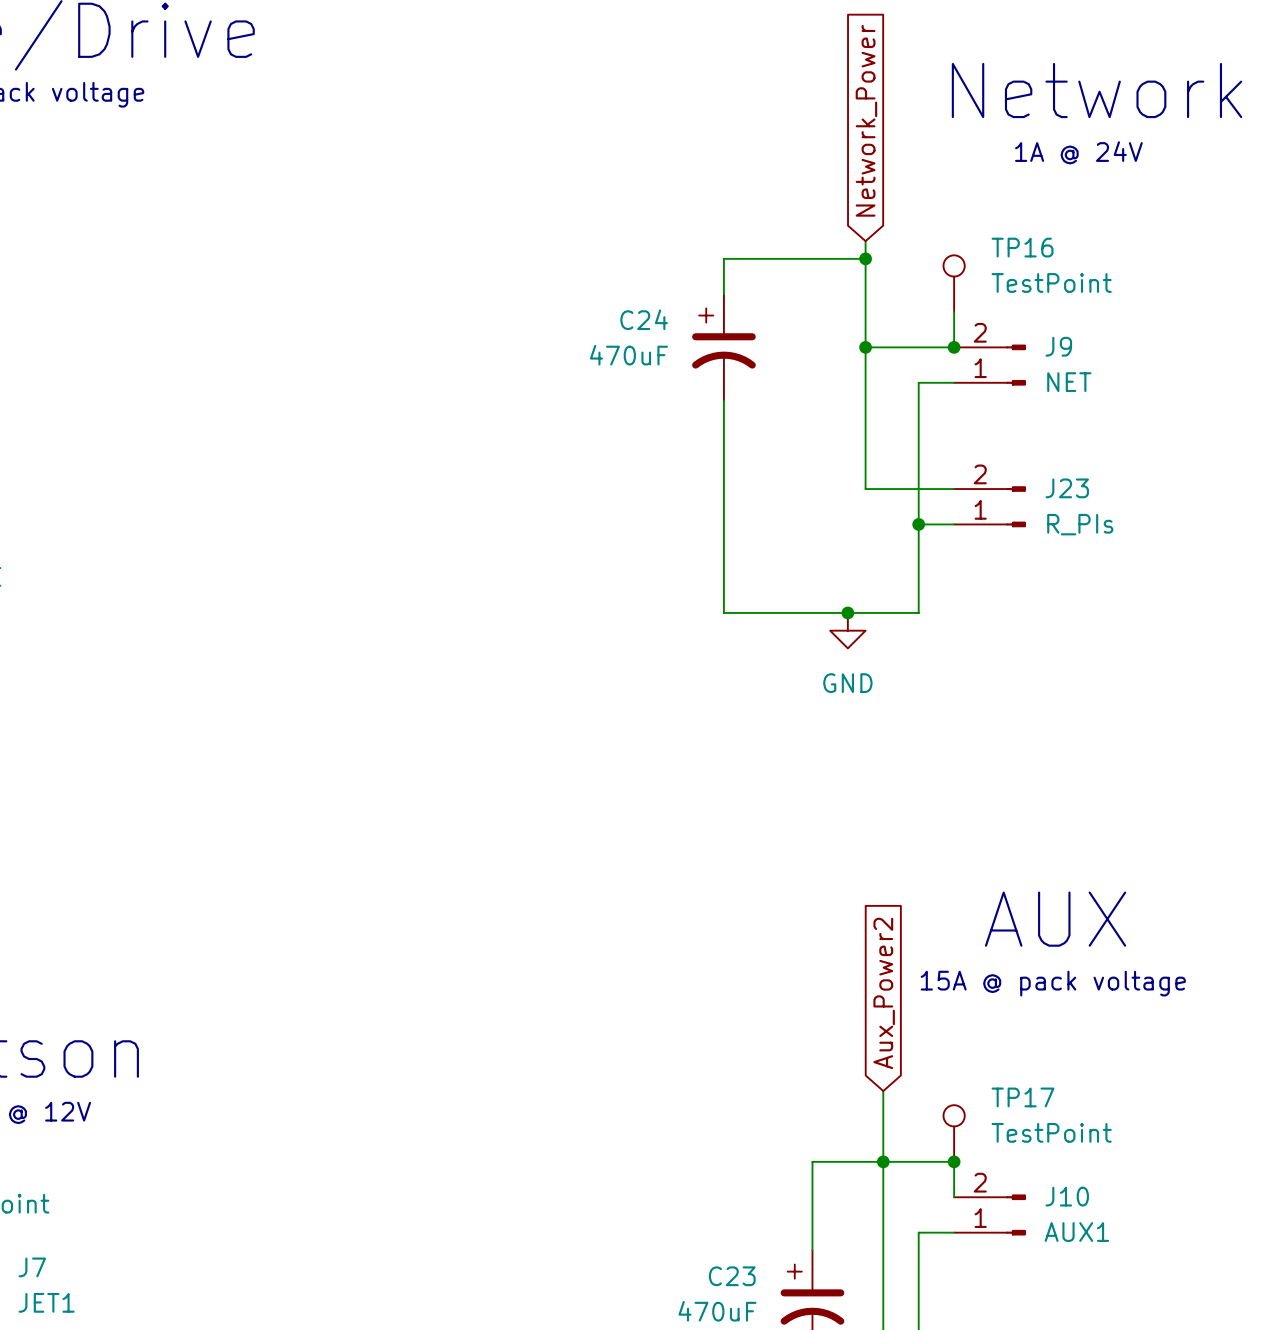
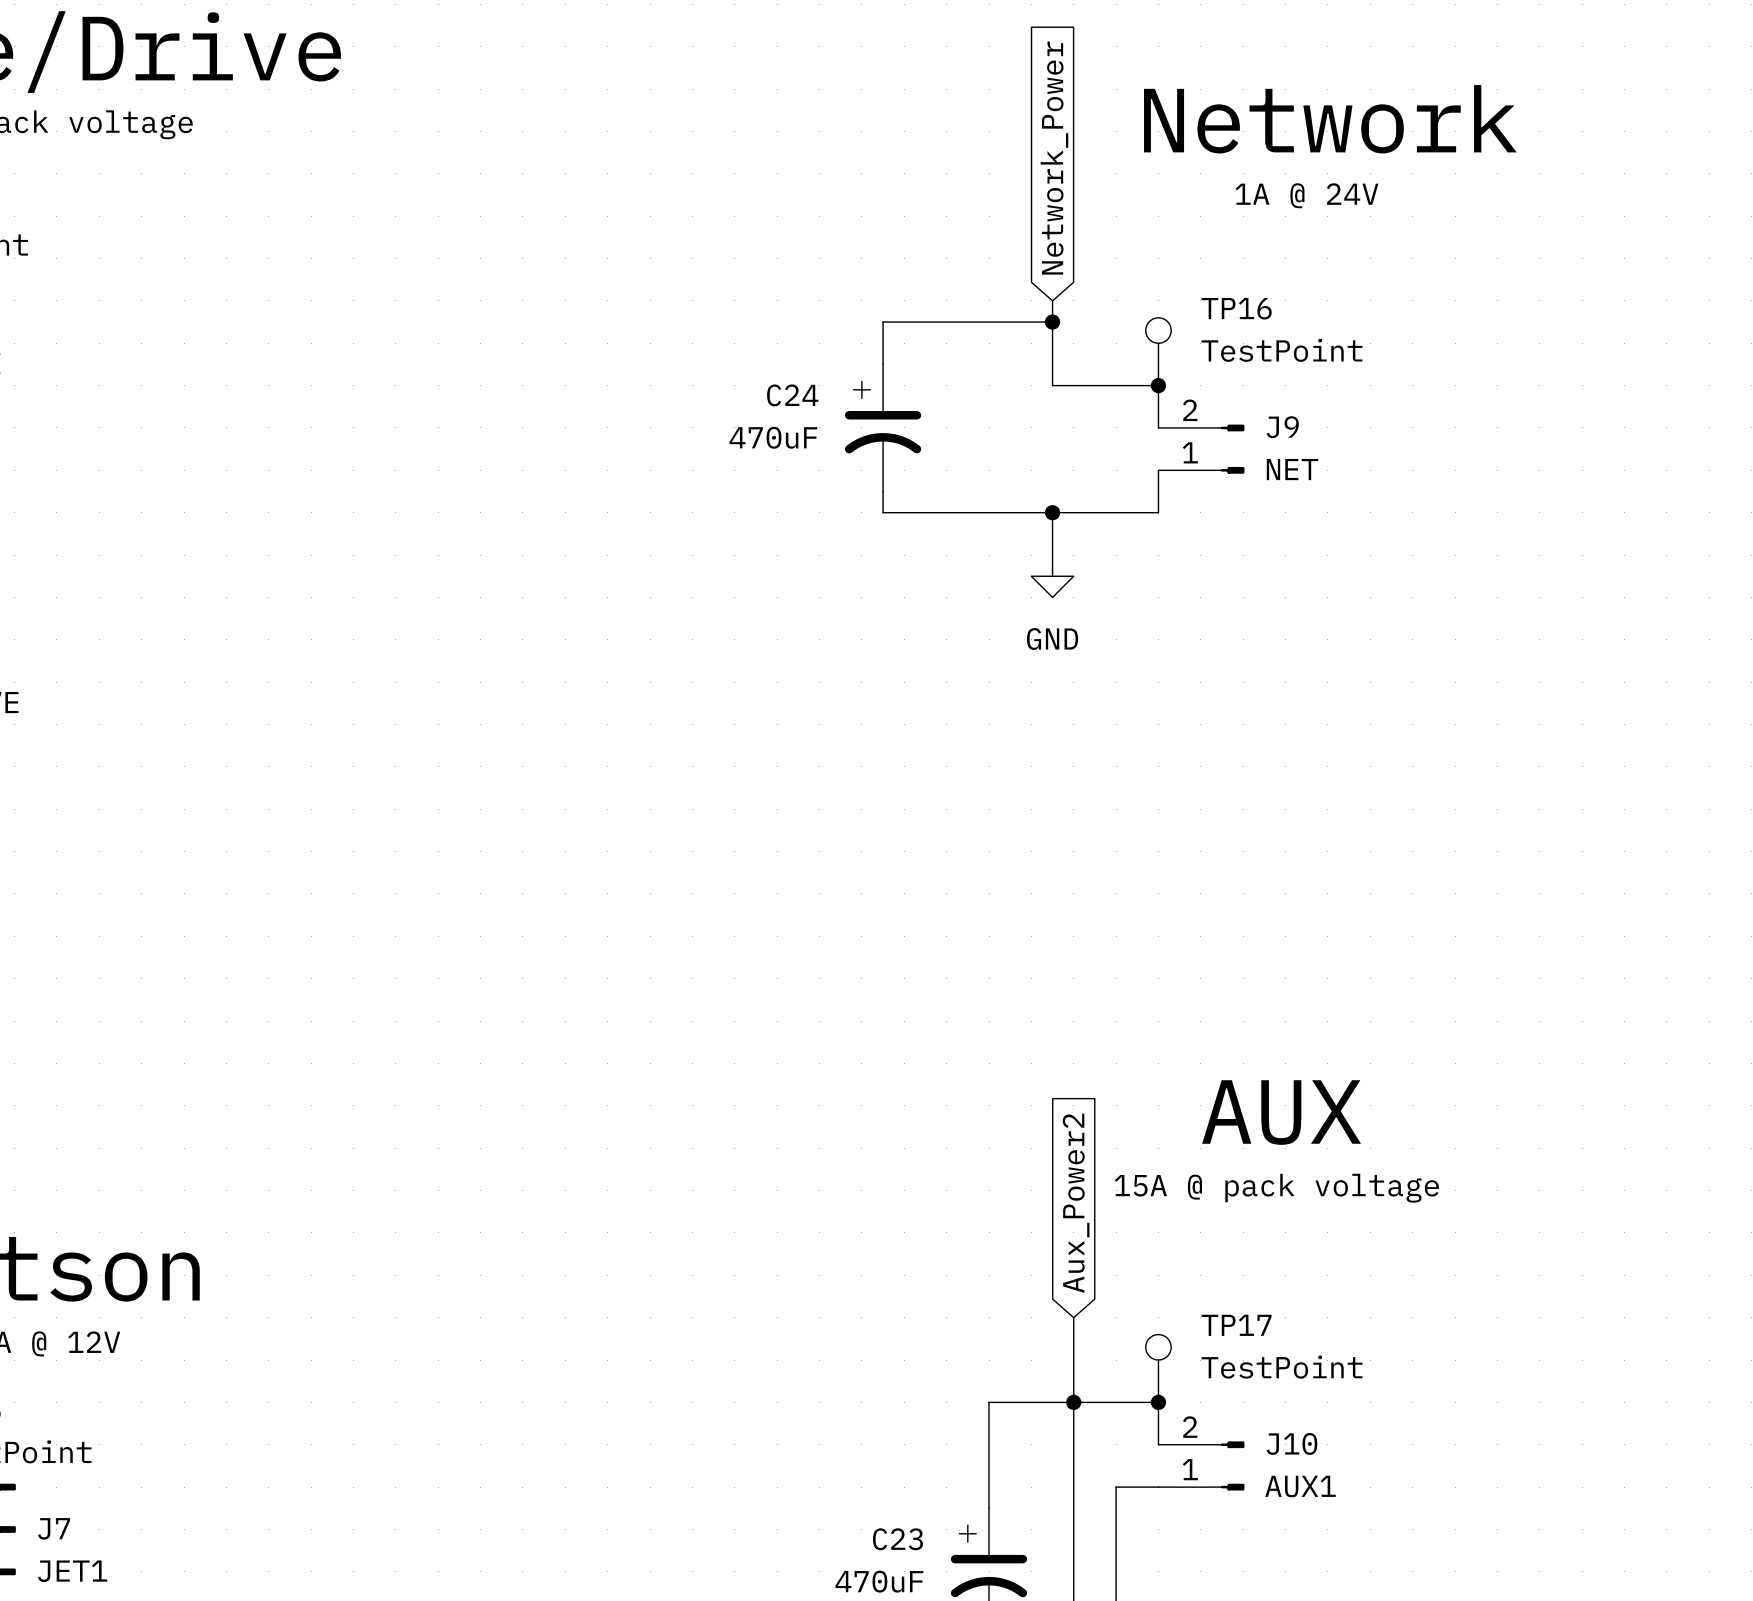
wire: (865, 311) (865, 418) -> (1052, 385) (1158, 385)
wire: (865, 347) (954, 347) -> none
junction: (865, 347) -> none
junction position: (954, 347) -> (1158, 385)
wire: (954, 382) (918, 382) (918, 612) (723, 612) (723, 418) -> (1158, 470) (1158, 512) (883, 512)
junction: none -> (1052, 512)
wire: (865, 453) (865, 489) (954, 489) -> none
J23: R_PIs (990, 506) -> none
wire: (918, 524) (954, 524) -> none
junction: (918, 524) -> none
junction: (847, 612) -> none
power symbol position: GND (847, 630) -> GND (1052, 576)

